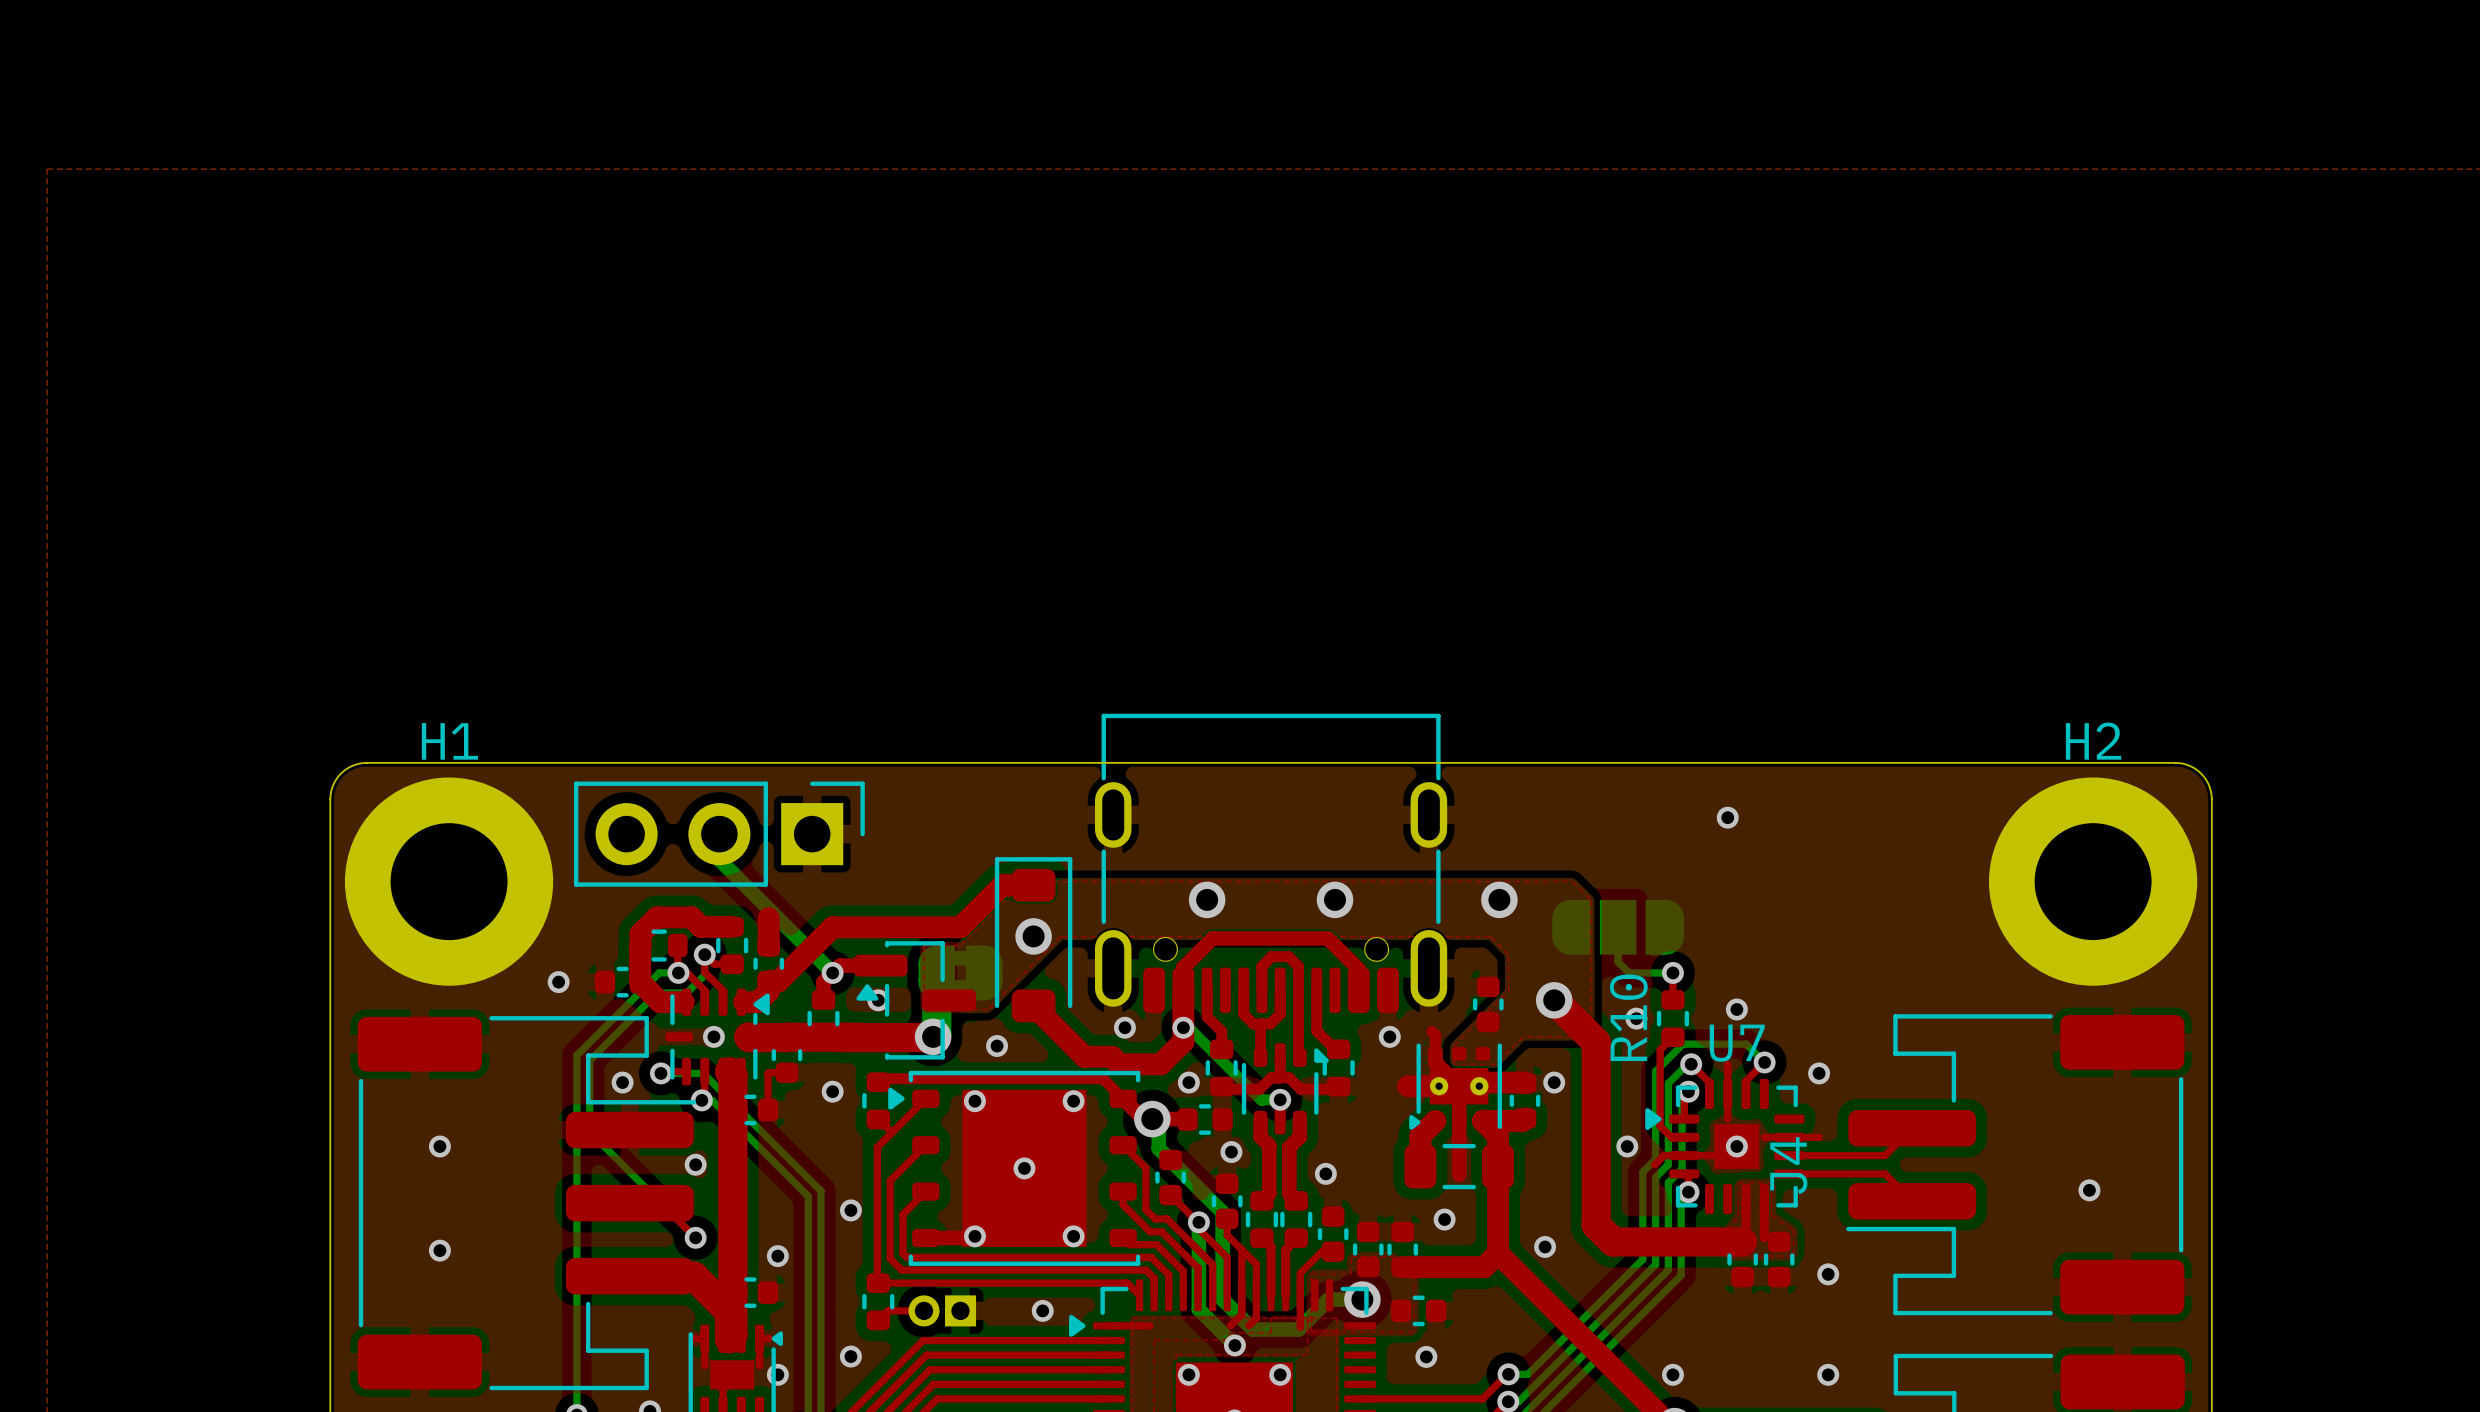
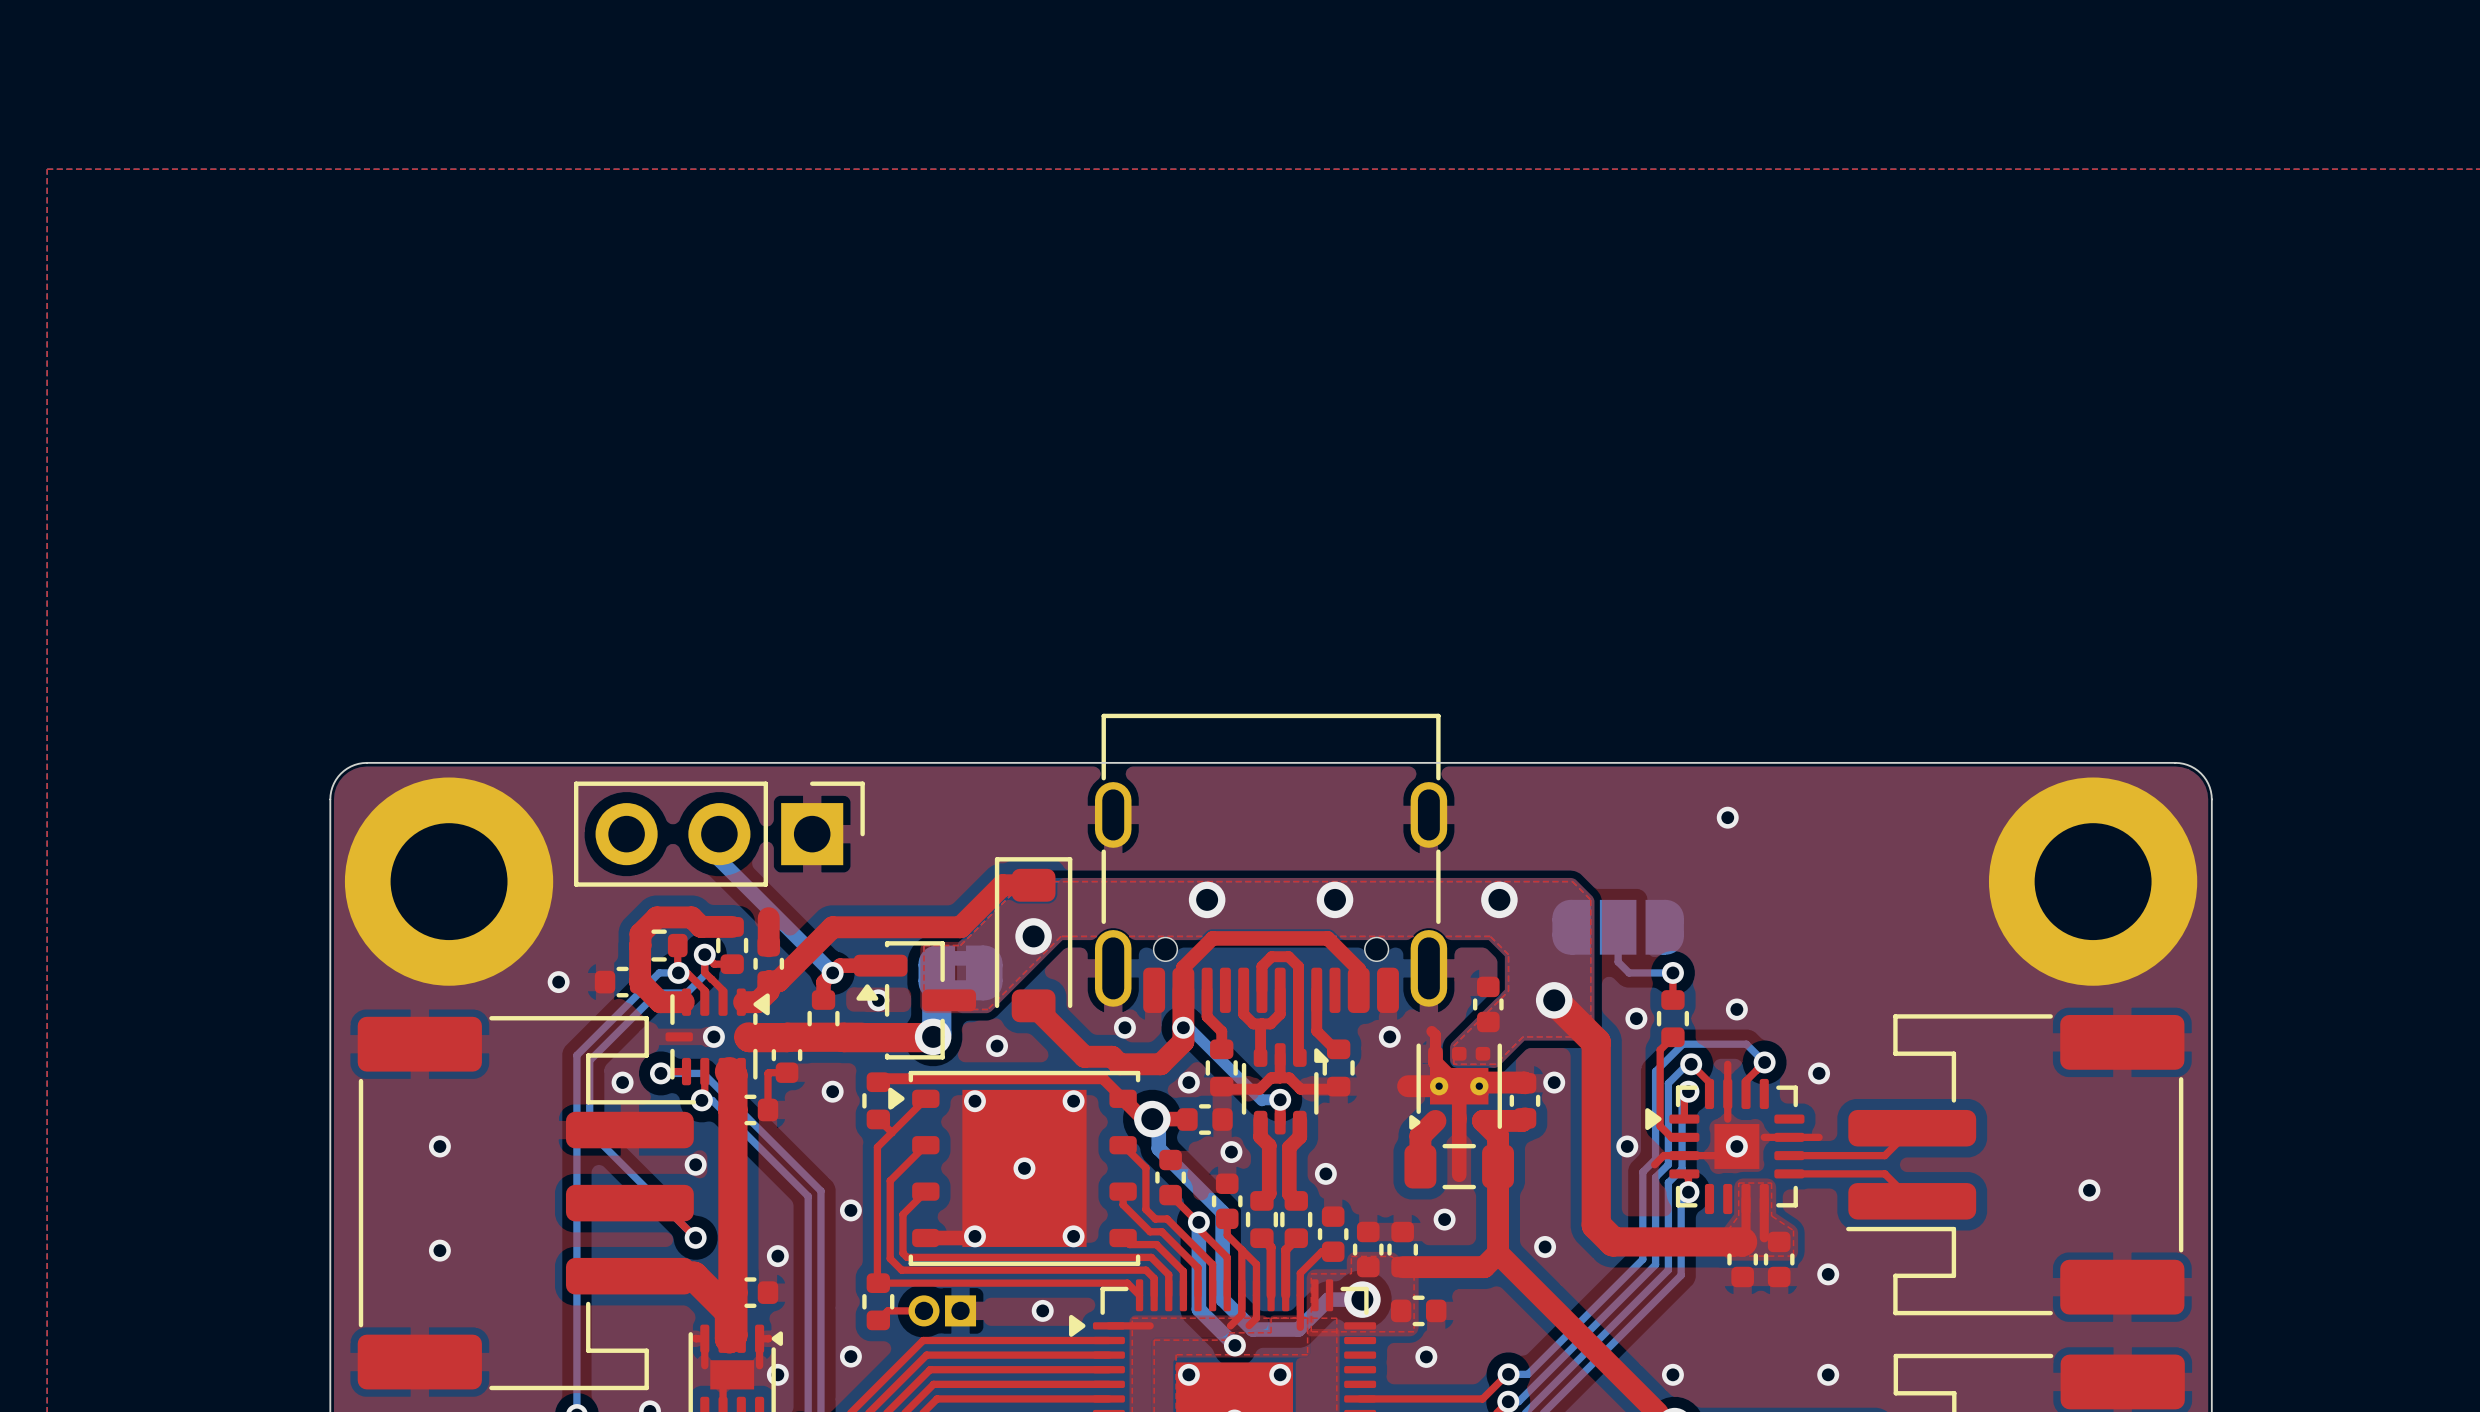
H1 name: H1 (449, 741) -> none
H2 name: H2 (2093, 741) -> none
R10 name: R10 (1628, 1017) -> none
U7 name: U7 (1737, 1043) -> none
J4 name: J4 (1788, 1165) -> none

